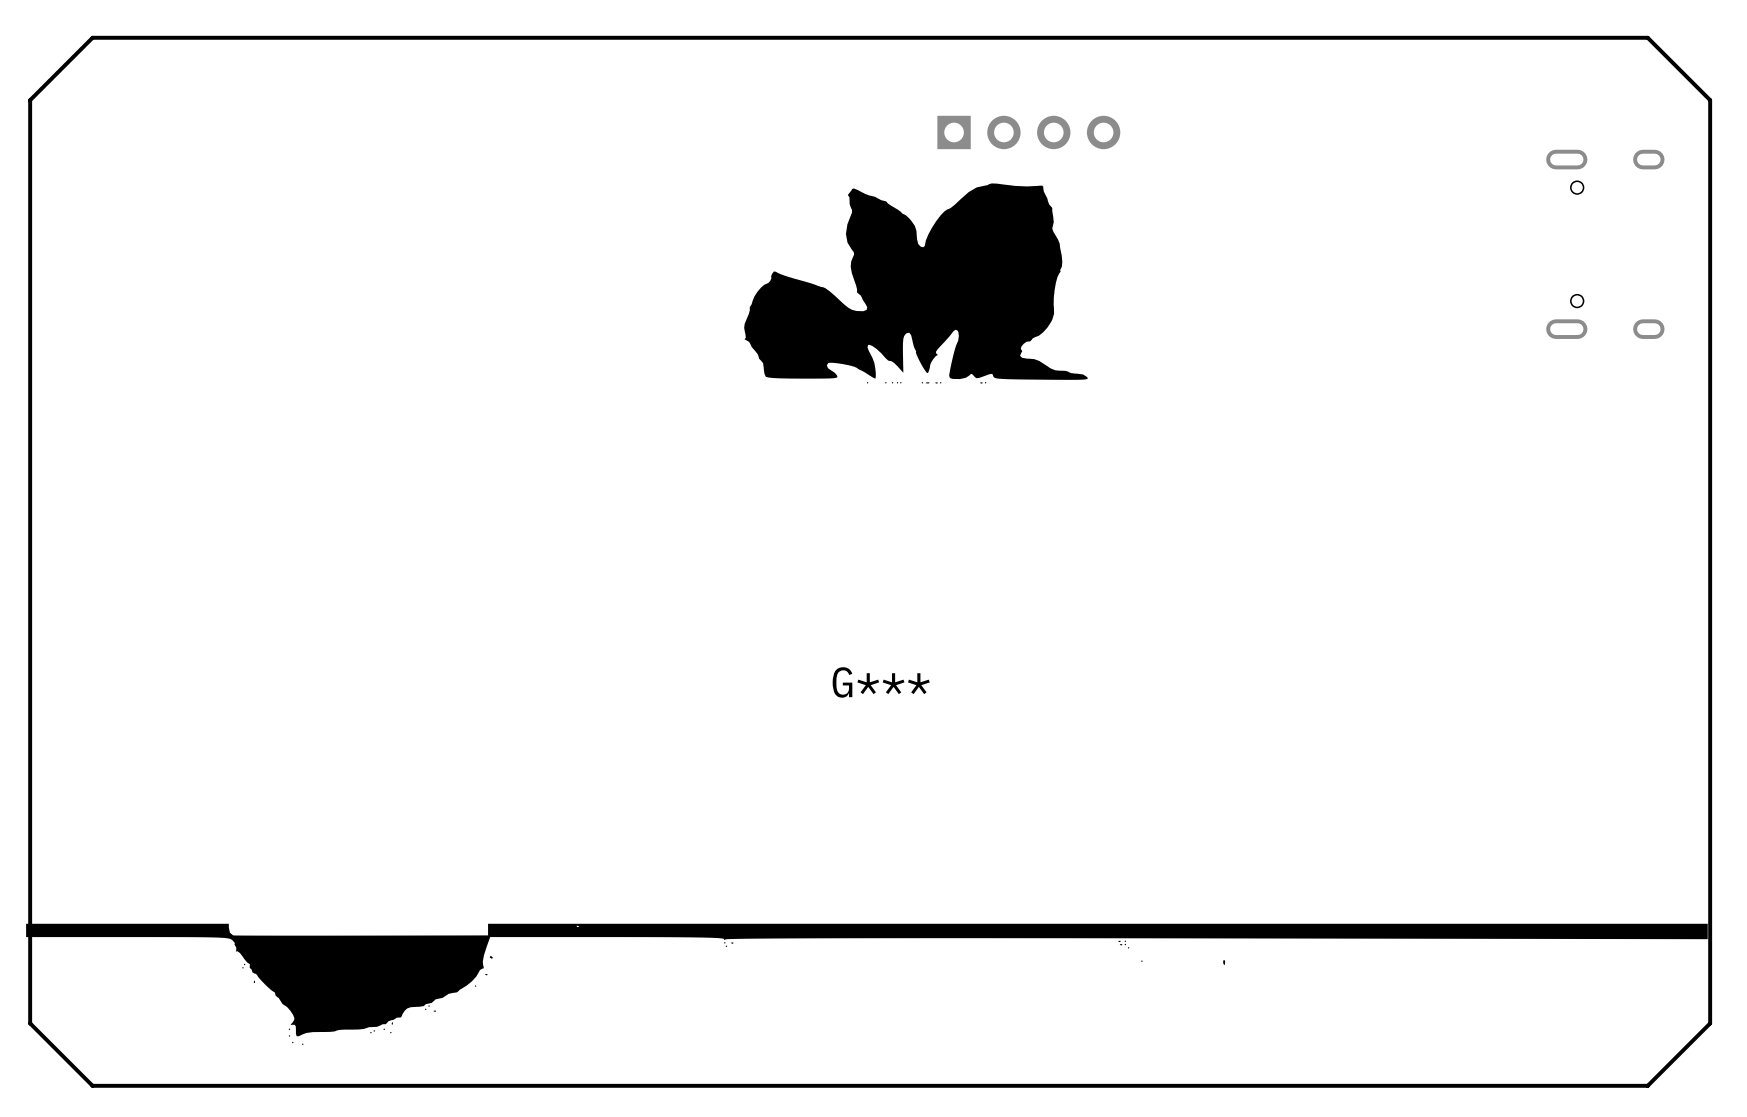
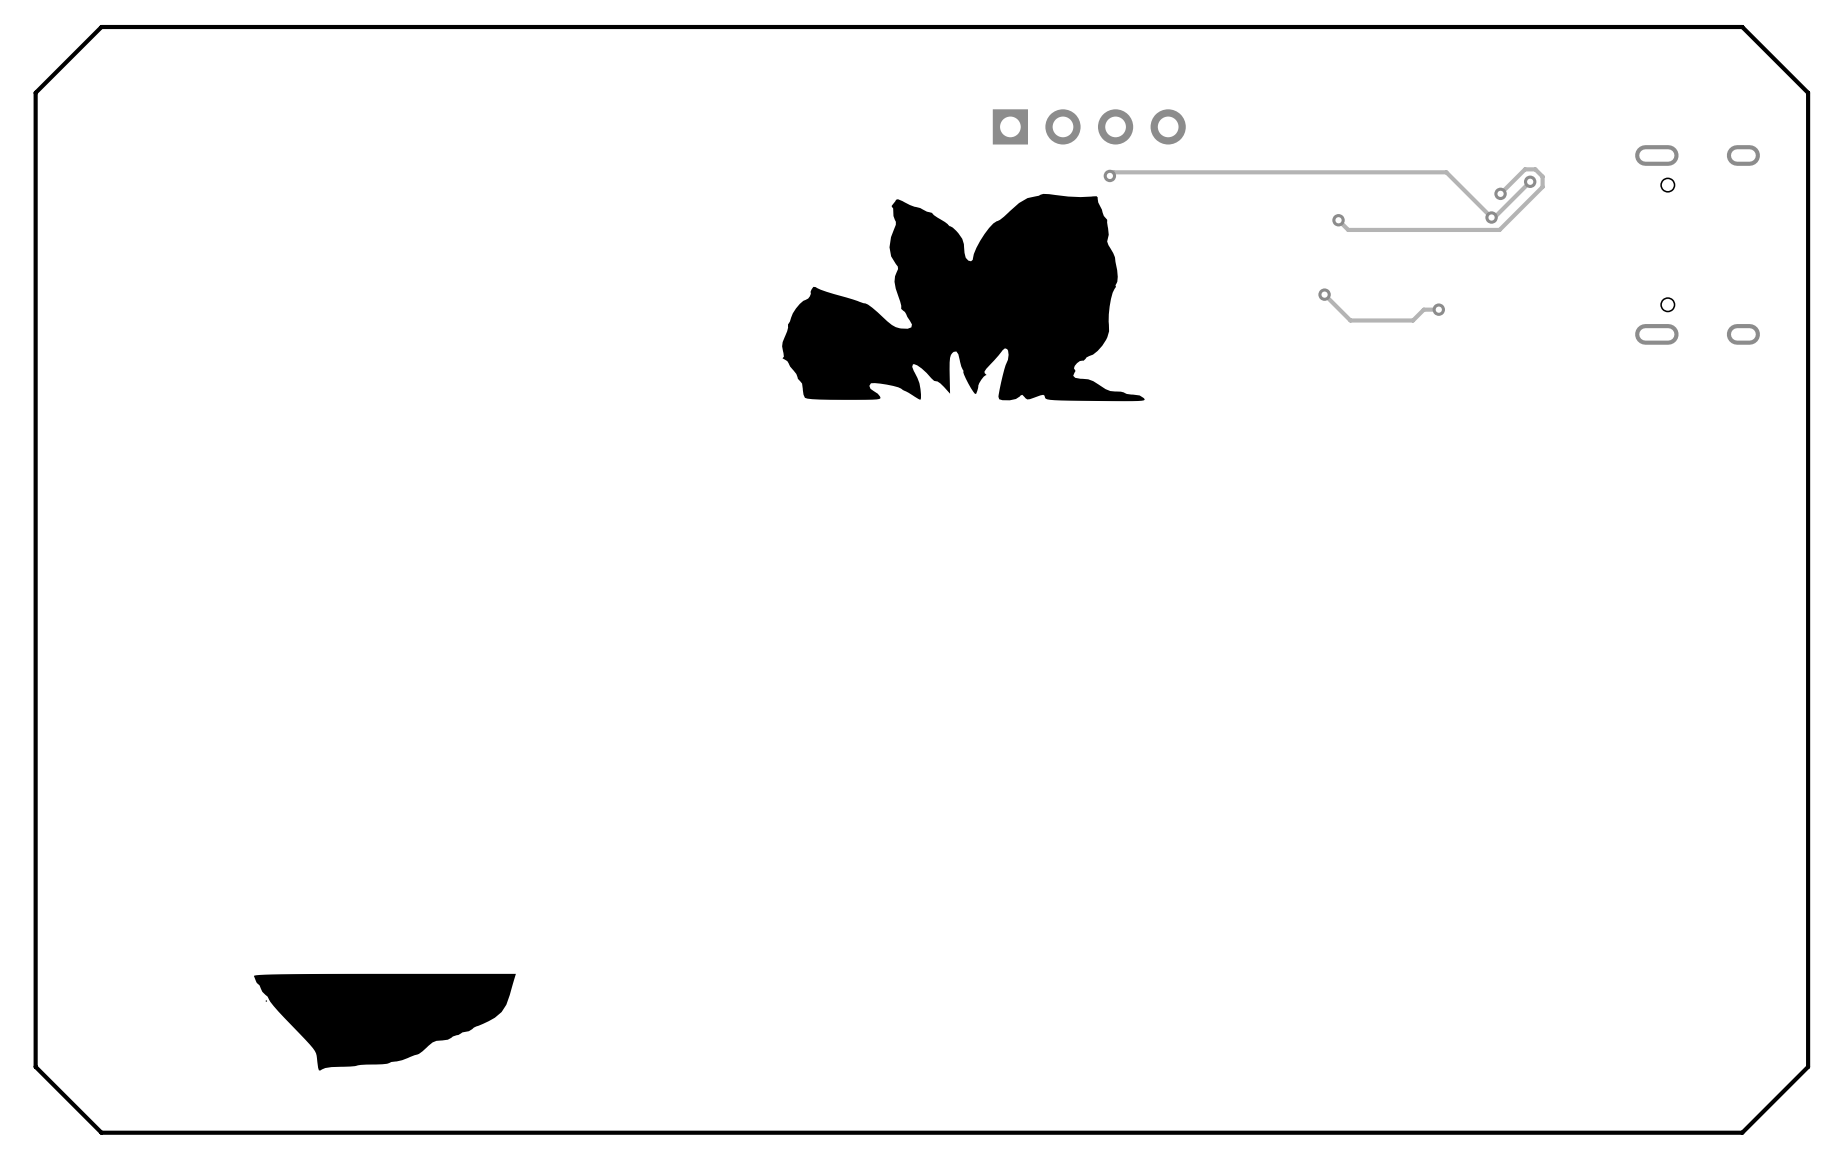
track: none -> (1109, 175) (1113, 172) (1446, 172) (1491, 217) (1494, 217) (1530, 181)
via: none -> (1109, 175)
via: none -> (1530, 181)
drawing: none -> [782, 193, 1145, 402]
track: none -> (1500, 193) (1525, 169) (1535, 169) (1542, 176) (1542, 186) (1499, 229) (1348, 229) (1338, 220)
via: none -> (1500, 193)
via: none -> (1491, 217)
via: none -> (1338, 220)
G***: (915, 283) -> none
track: none -> (1324, 294) (1350, 320) (1413, 320) (1423, 309) (1438, 309)
via: none -> (1324, 294)
via: none -> (1438, 309)
drawing: [26, 923, 1708, 1046] -> none
drawing: none -> [253, 973, 516, 1071]

